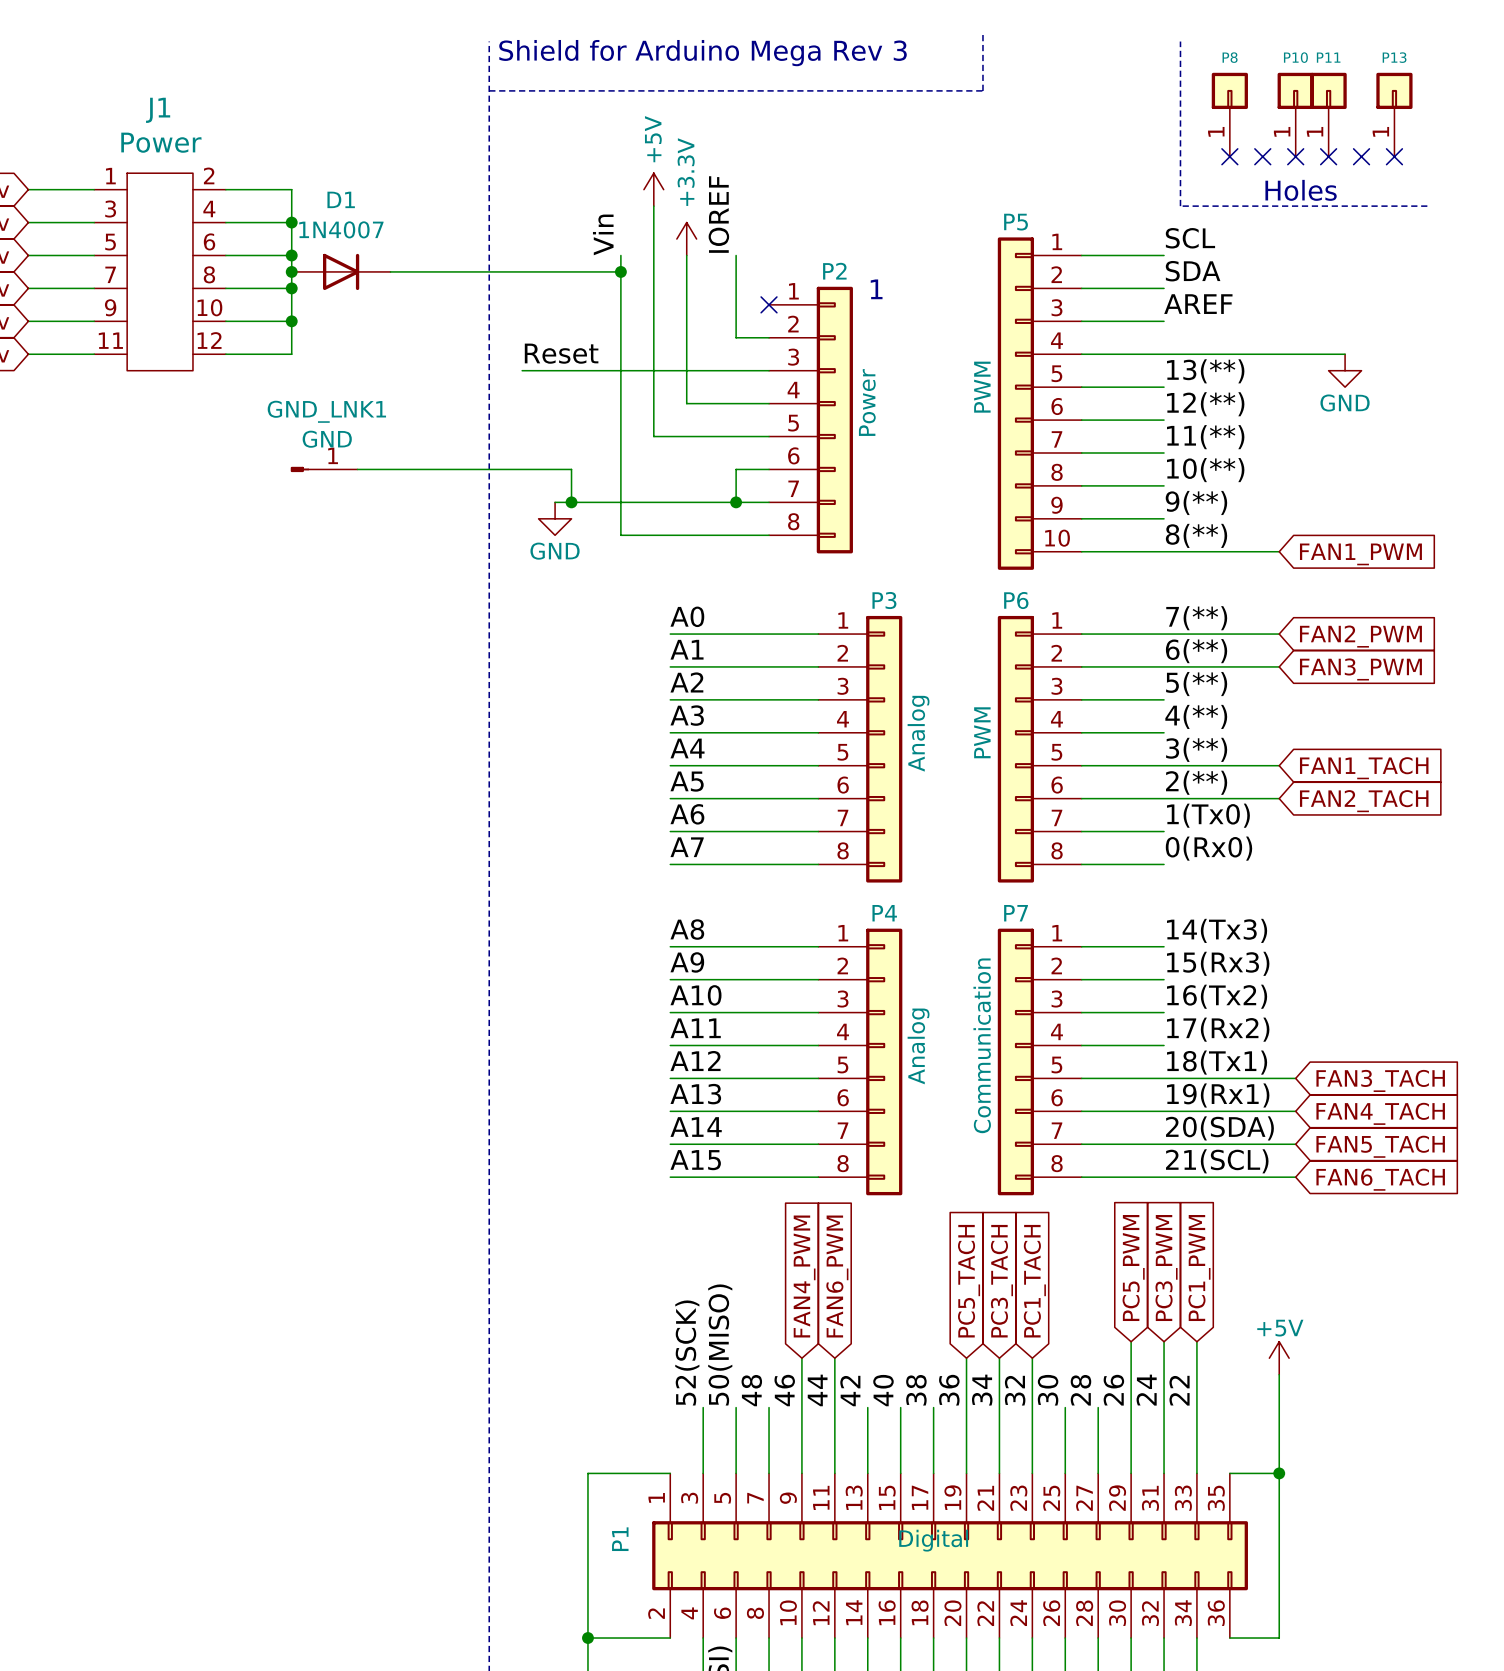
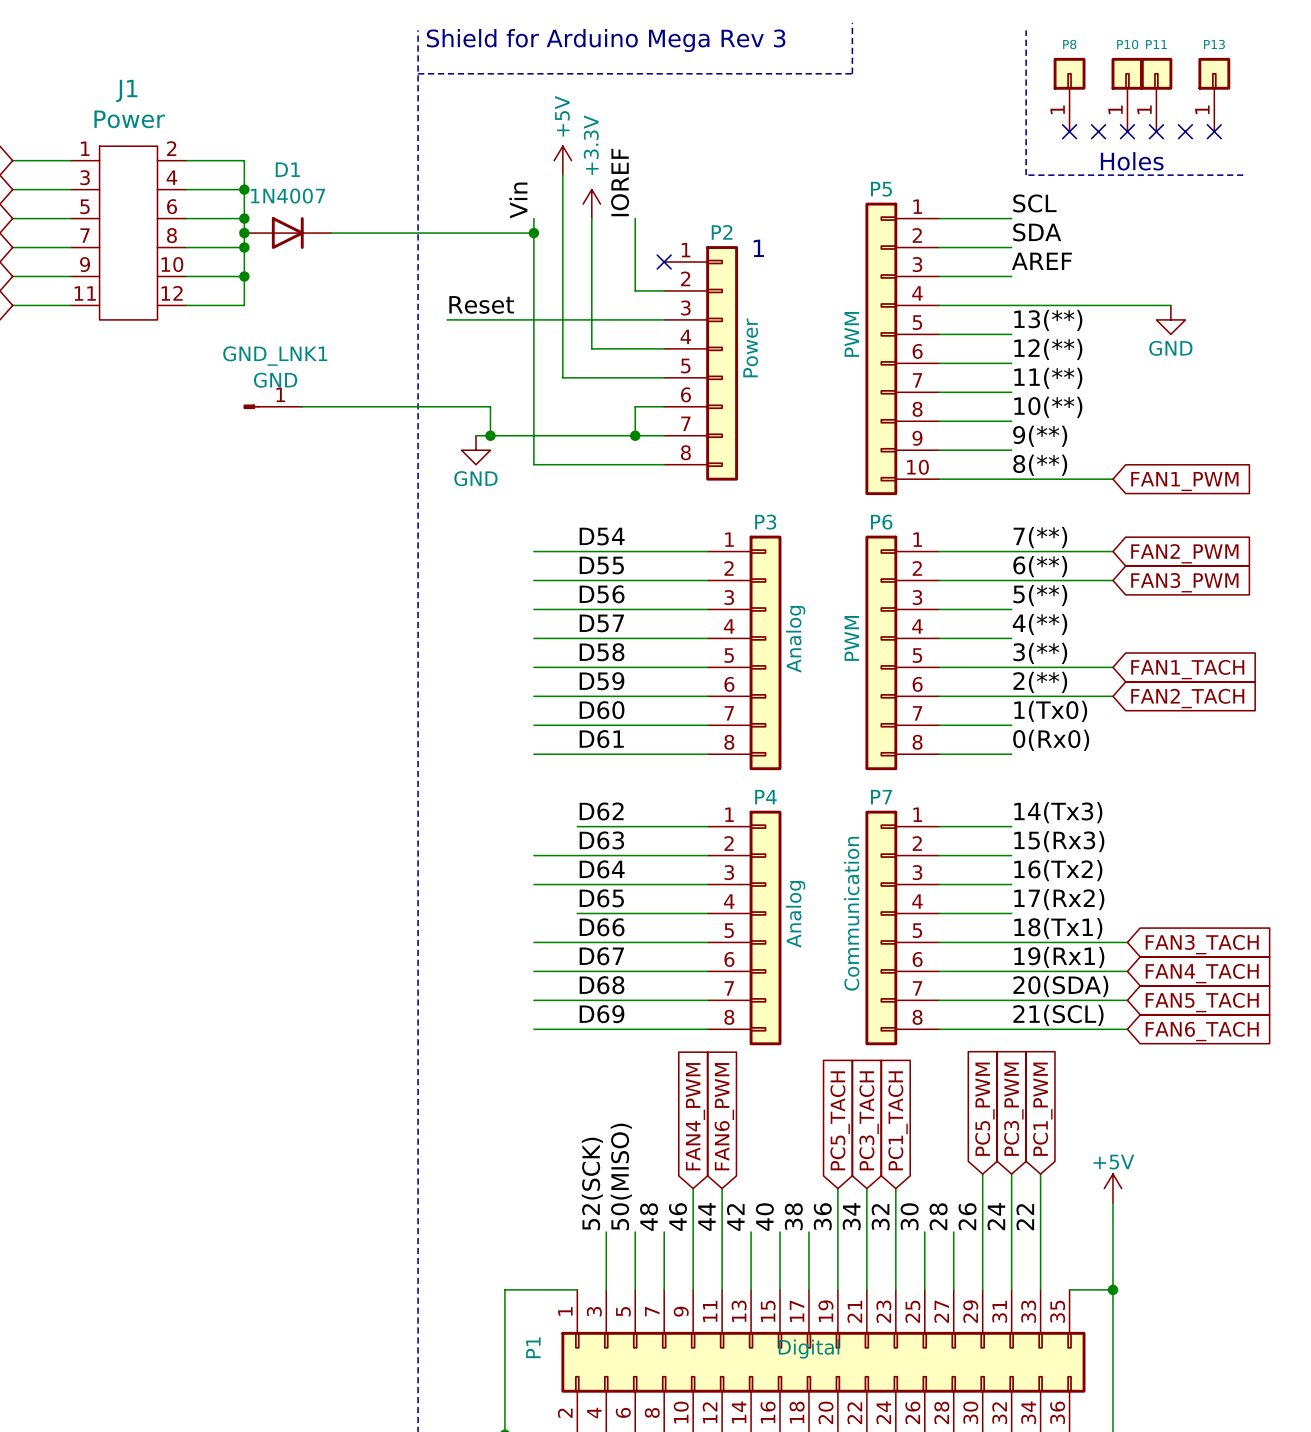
label: A0 (687, 616) -> D54 (602, 536)
wire: none -> (533, 551) (577, 551)
label: A1 (687, 649) -> D55 (601, 565)
wire: none -> (533, 580) (577, 580)
label: A2 (686, 682) -> D56 (602, 594)
wire: none -> (533, 609) (577, 609)
label: A3 (687, 715) -> D57 (601, 623)
wire: none -> (533, 638) (577, 638)
label: A4 (687, 748) -> D58 (602, 652)
wire: none -> (533, 667) (577, 667)
label: A5 (687, 781) -> D59 (601, 681)
wire: none -> (533, 696) (577, 696)
label: A6 (687, 814) -> D60 (602, 710)
wire: none -> (533, 725) (577, 725)
label: A7 (687, 847) -> D61 (601, 739)
wire: none -> (533, 754) (577, 754)
label: A8 (687, 929) -> D62 (601, 811)
label: A9 (687, 962) -> D63 (601, 840)
wire: none -> (533, 855) (577, 855)
label: A10 (695, 995) -> D64 (602, 869)
wire: none -> (533, 884) (577, 884)
label: A11 (695, 1028) -> D65 (601, 898)
label: A12 (695, 1061) -> D66 (602, 927)
wire: none -> (533, 942) (577, 942)
label: A13 (695, 1094) -> D67 (601, 956)
wire: none -> (533, 971) (577, 971)
label: A14 (696, 1127) -> D68 (602, 985)
wire: none -> (533, 1000) (577, 1000)
label: A15 (695, 1160) -> D69 (601, 1014)
wire: none -> (533, 1029) (577, 1029)

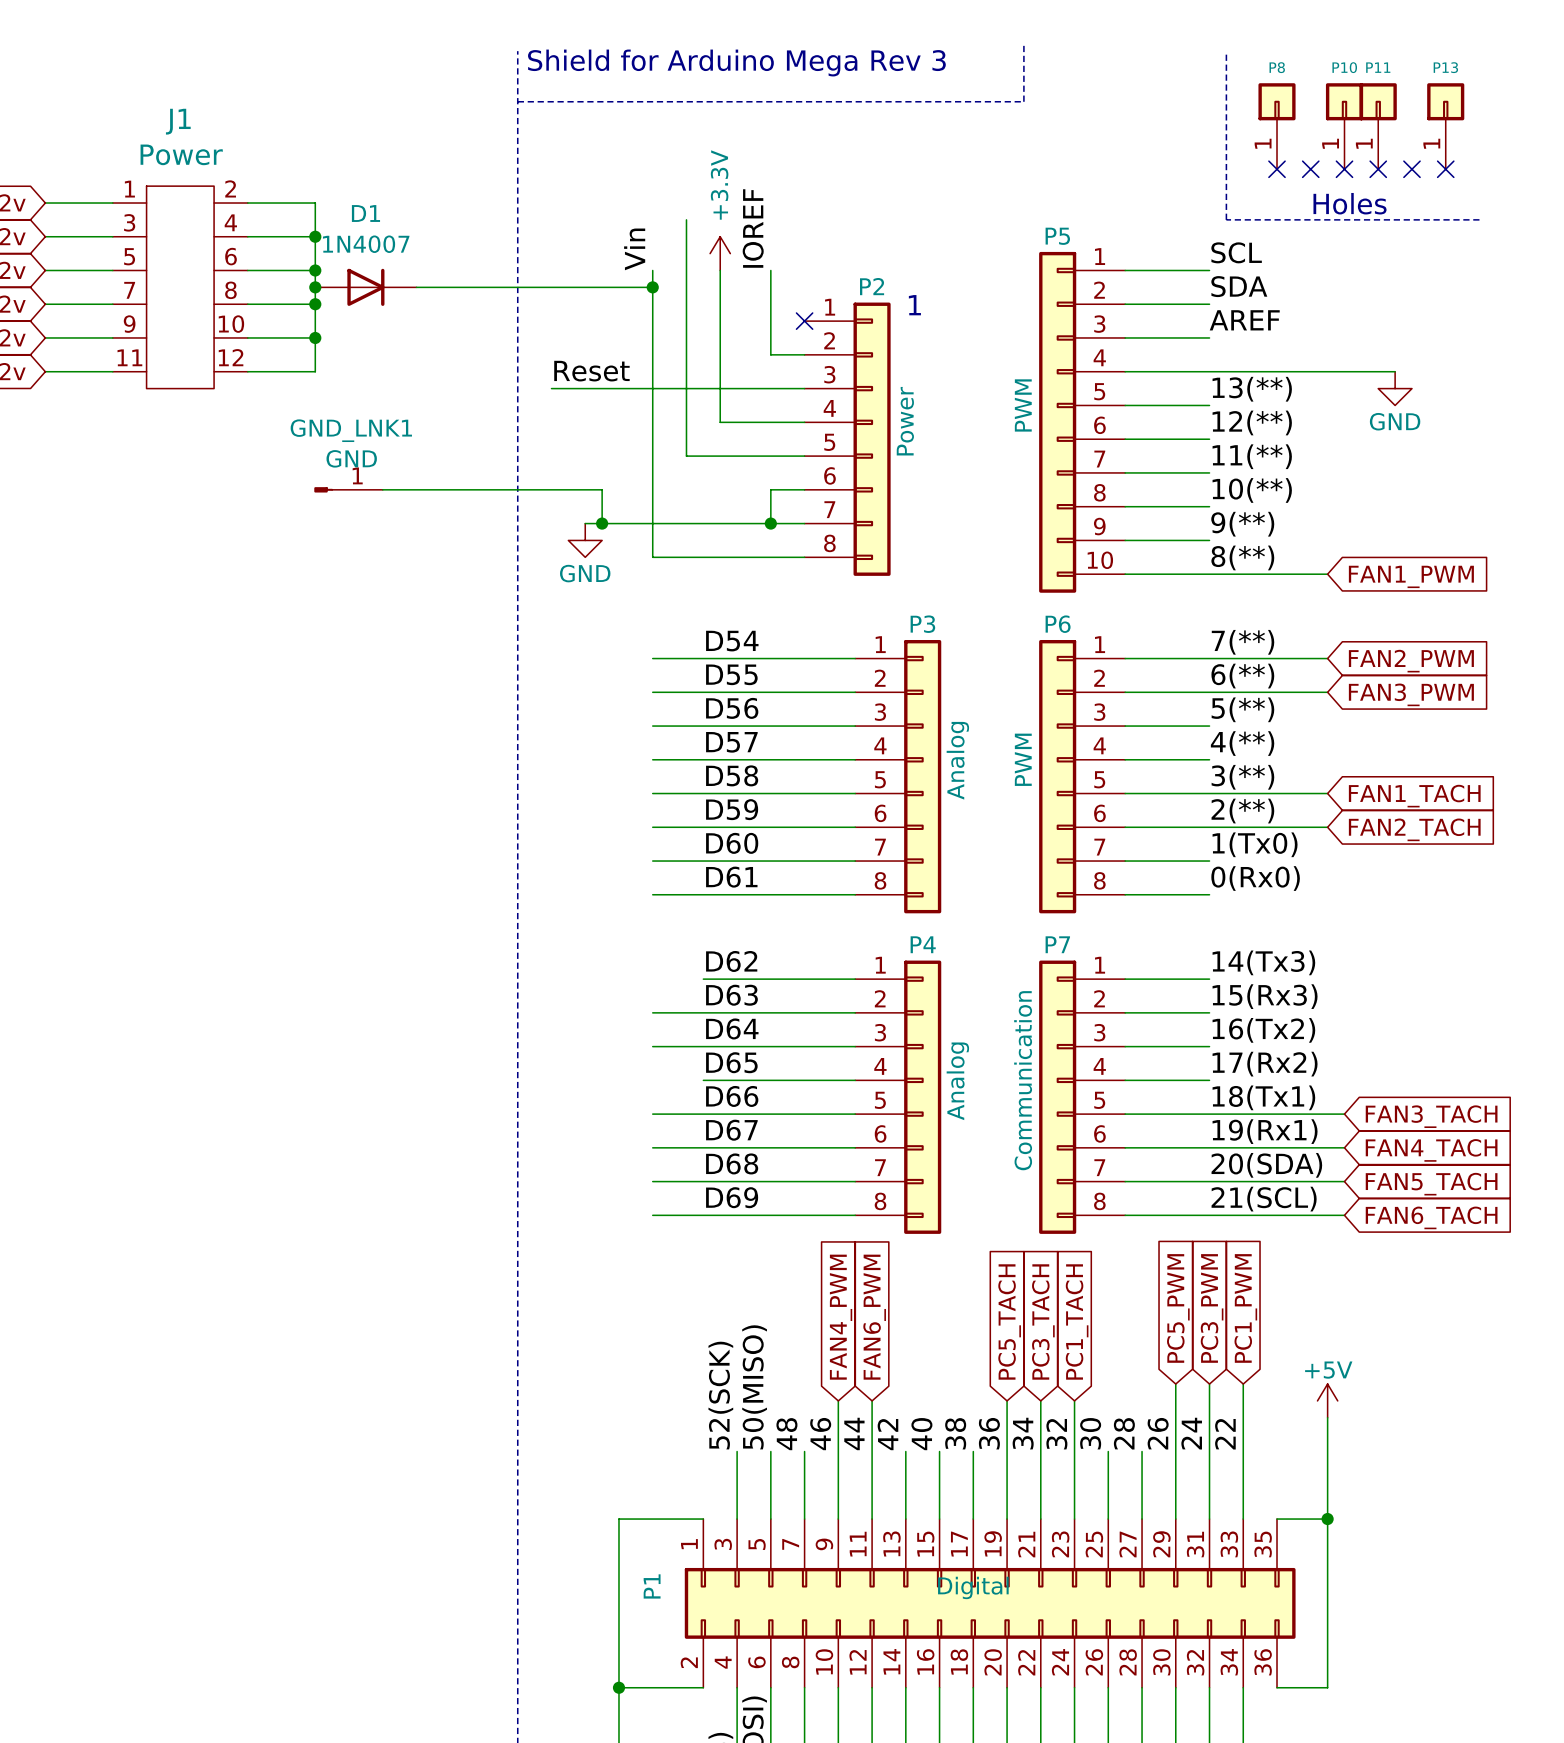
power symbol: +5V (562, 160) -> none

